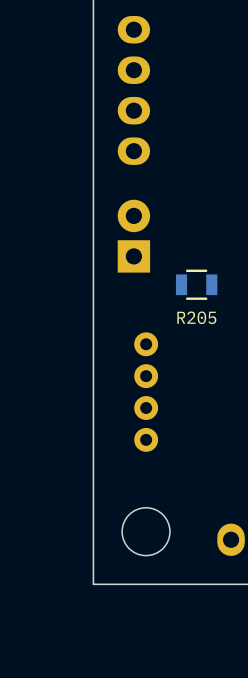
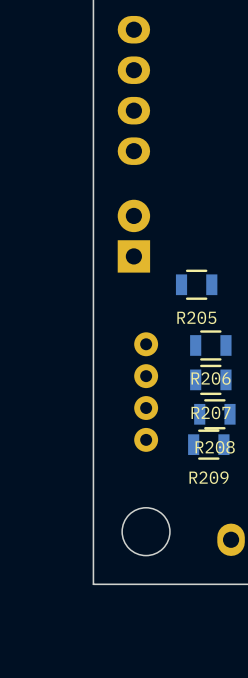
R206: none -> (210, 345)
R207: none -> (210, 379)
R208: none -> (214, 414)
R209: none -> (208, 444)

